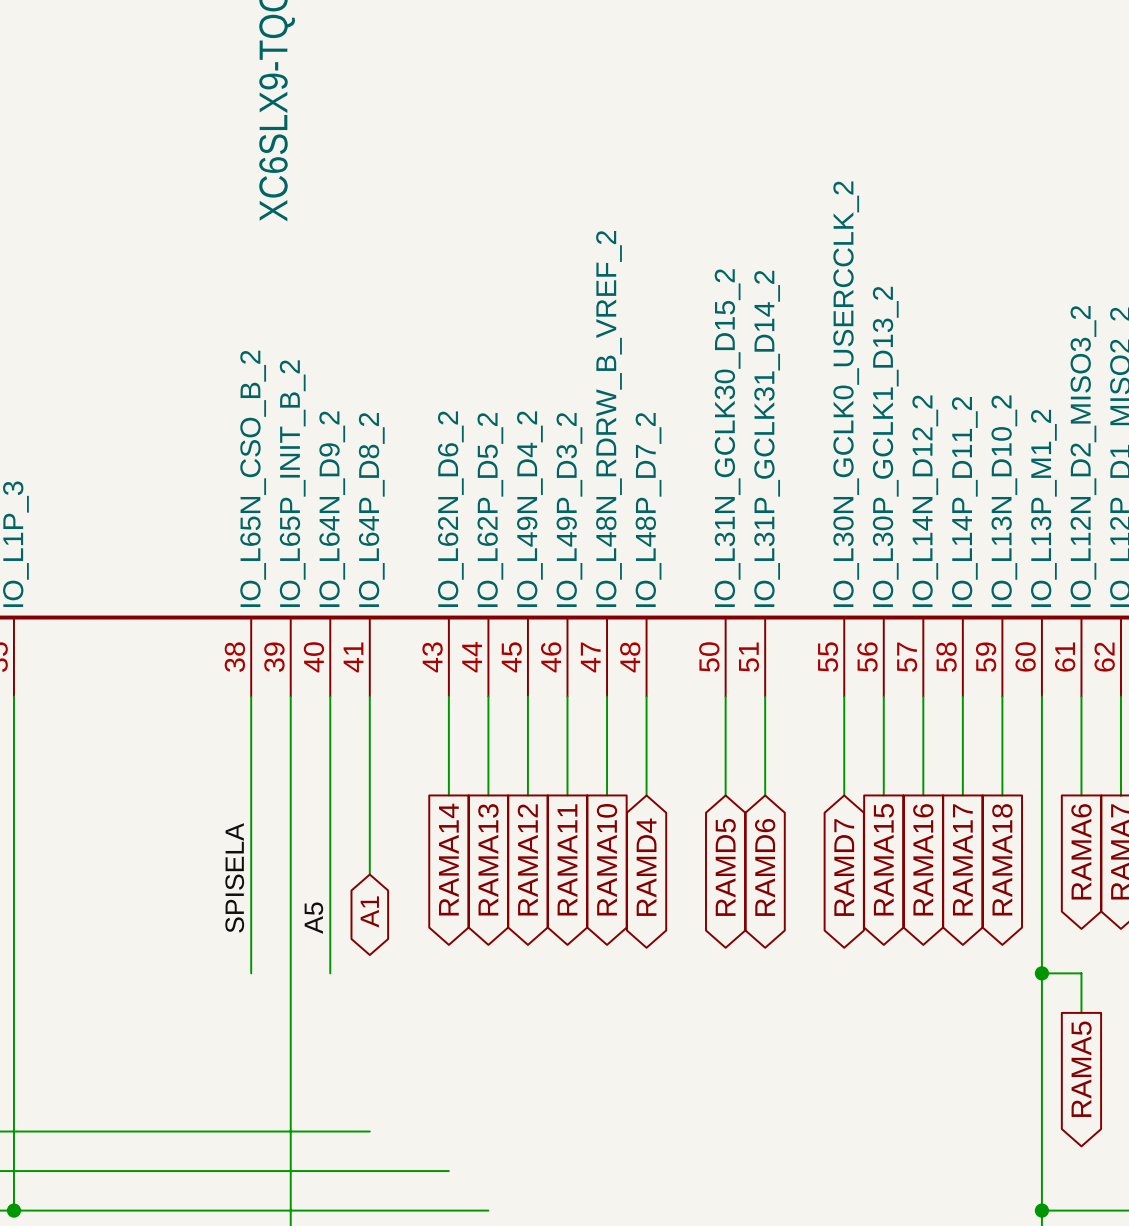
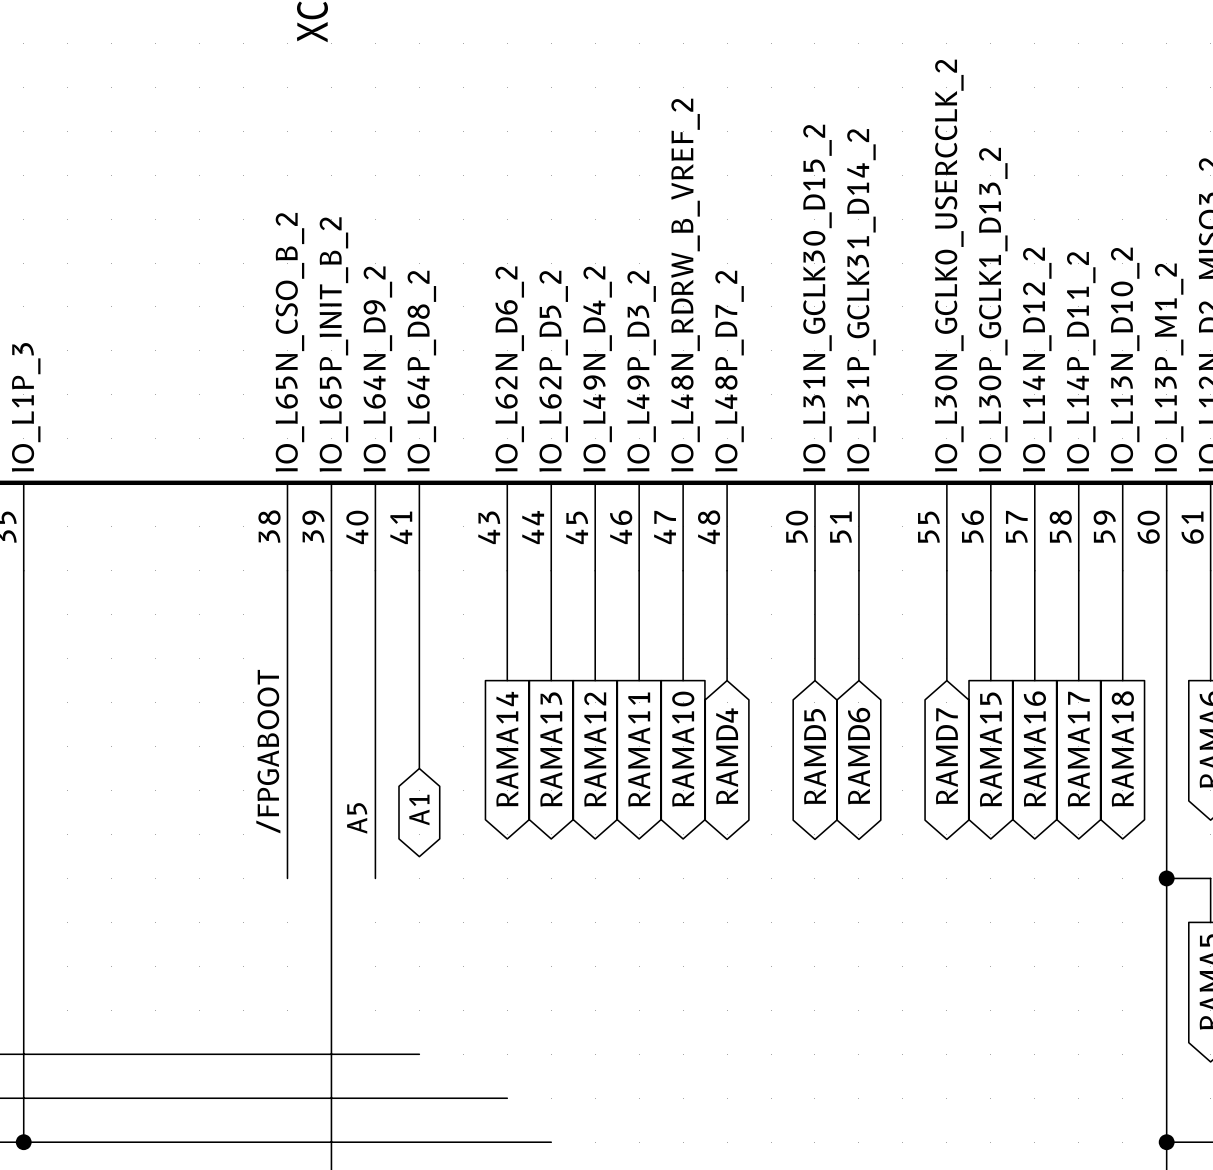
label: SPISELA (234, 877) -> /FPGABOOT (268, 751)

